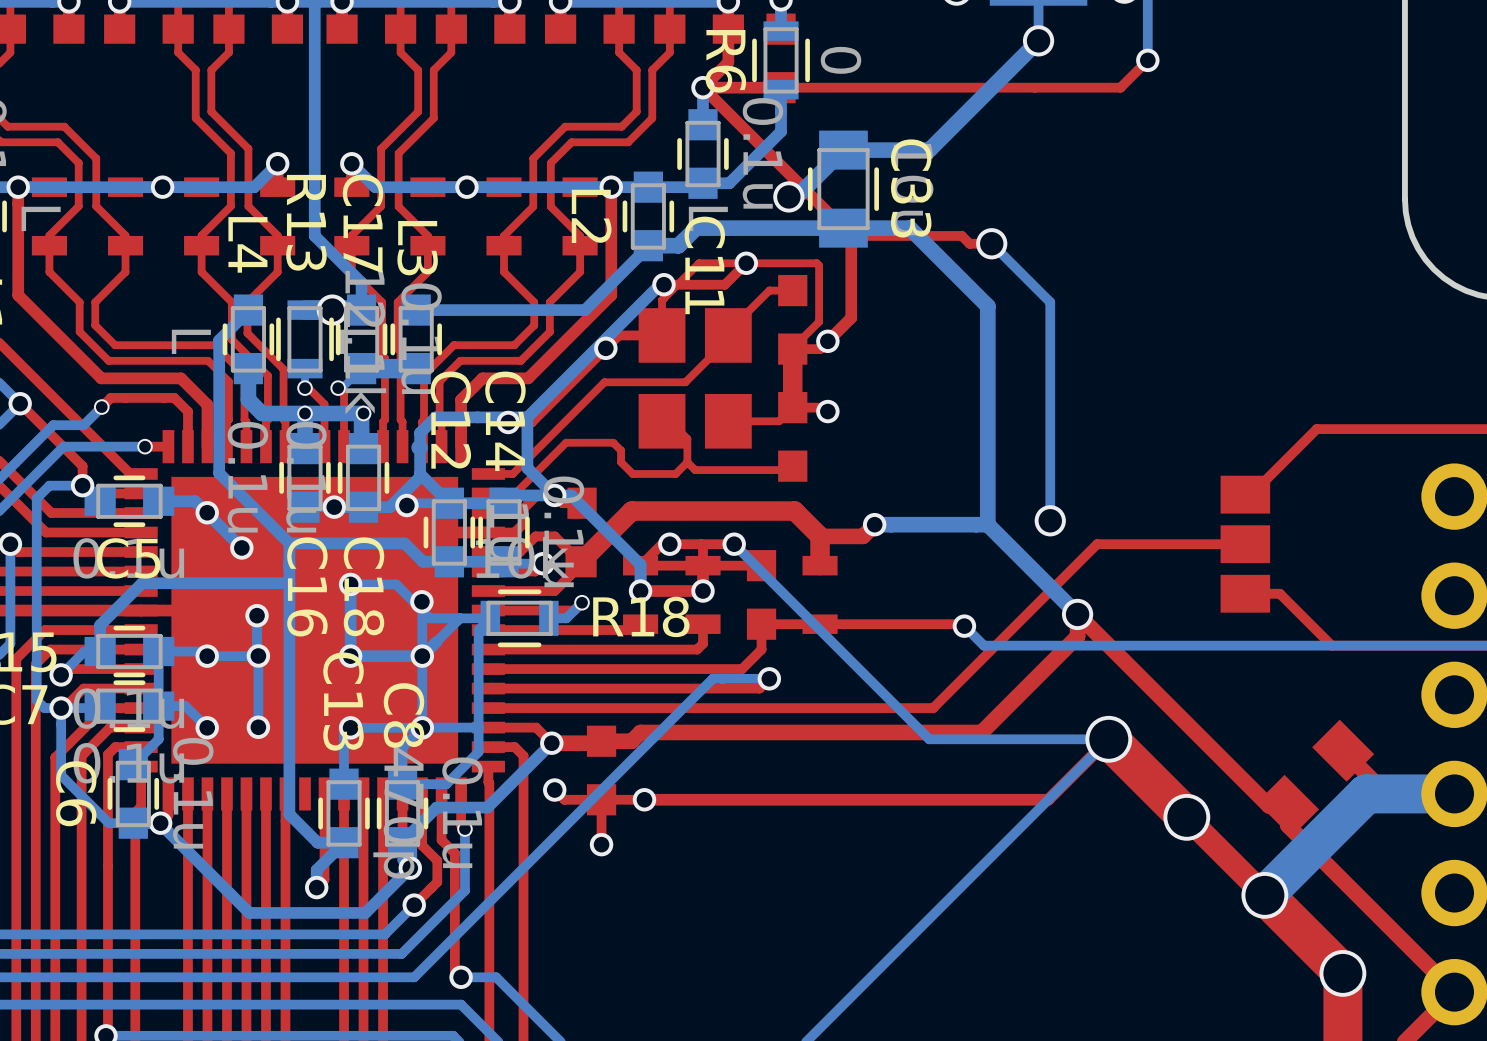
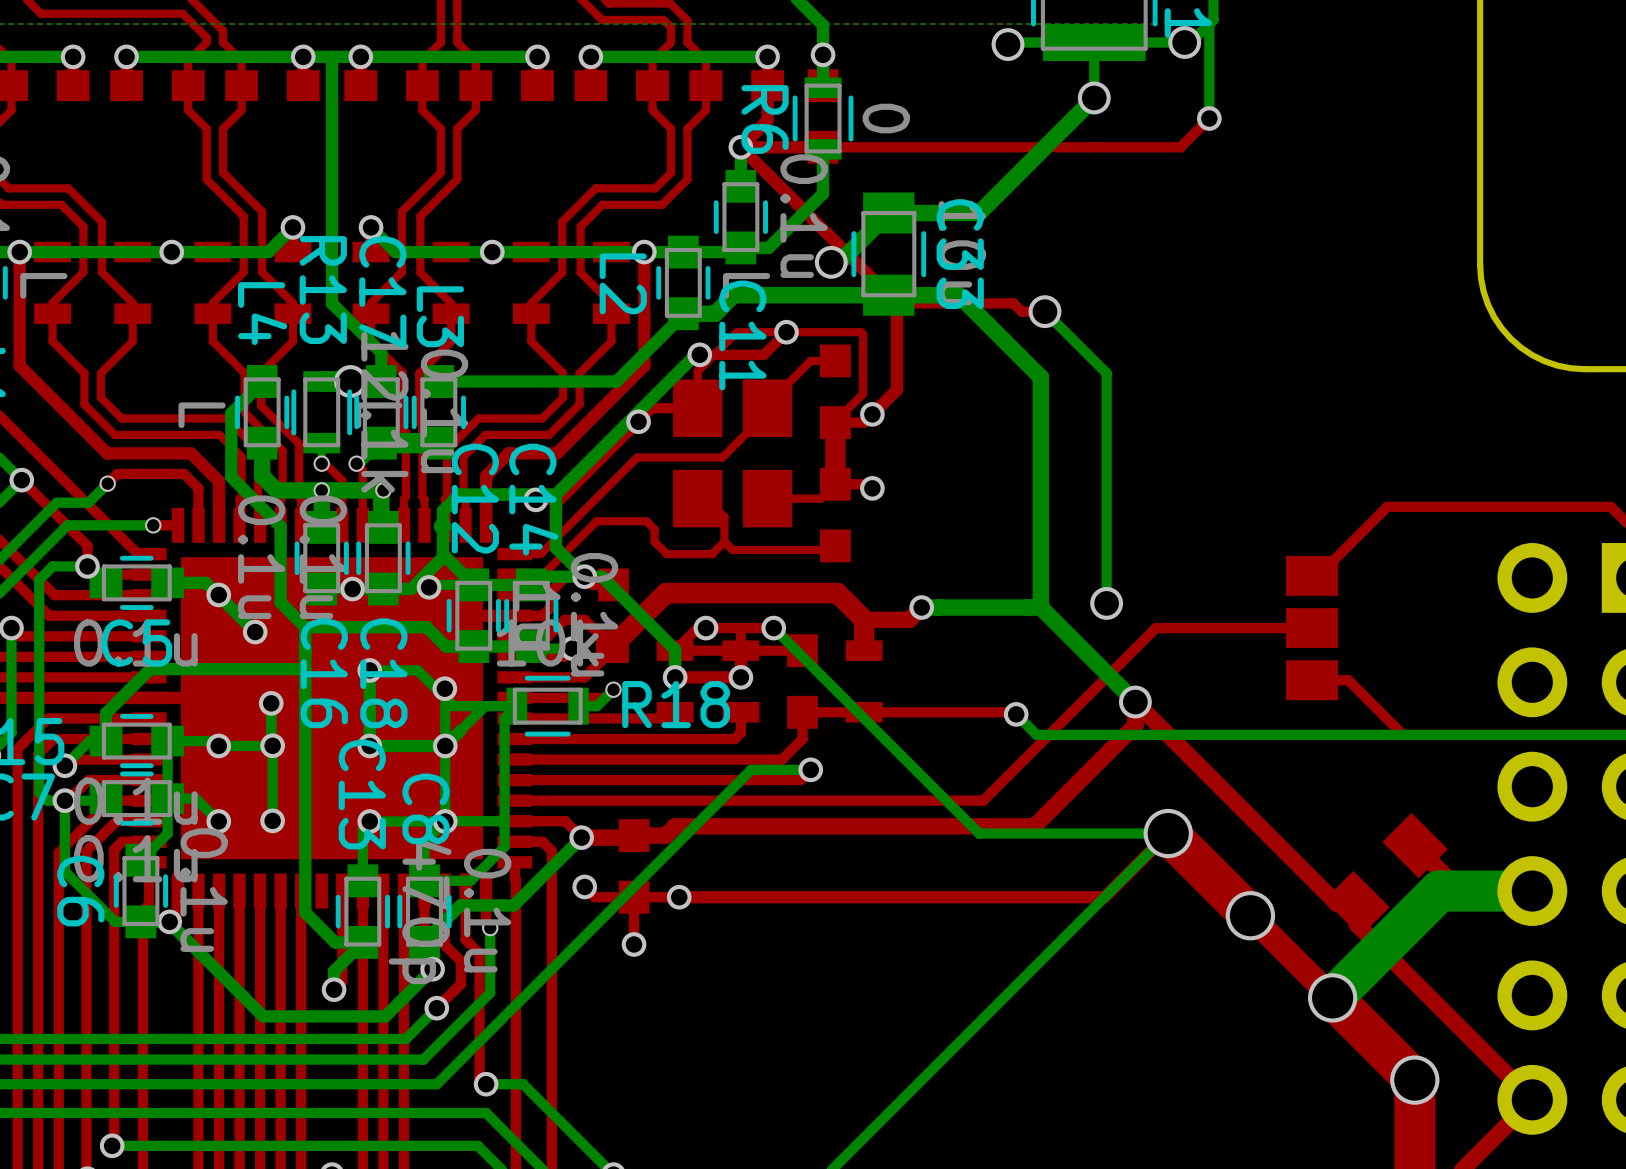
bottom track: (219, 400) (219, 473) (265, 520) -> (231, 477) (280, 526) (280, 602)

